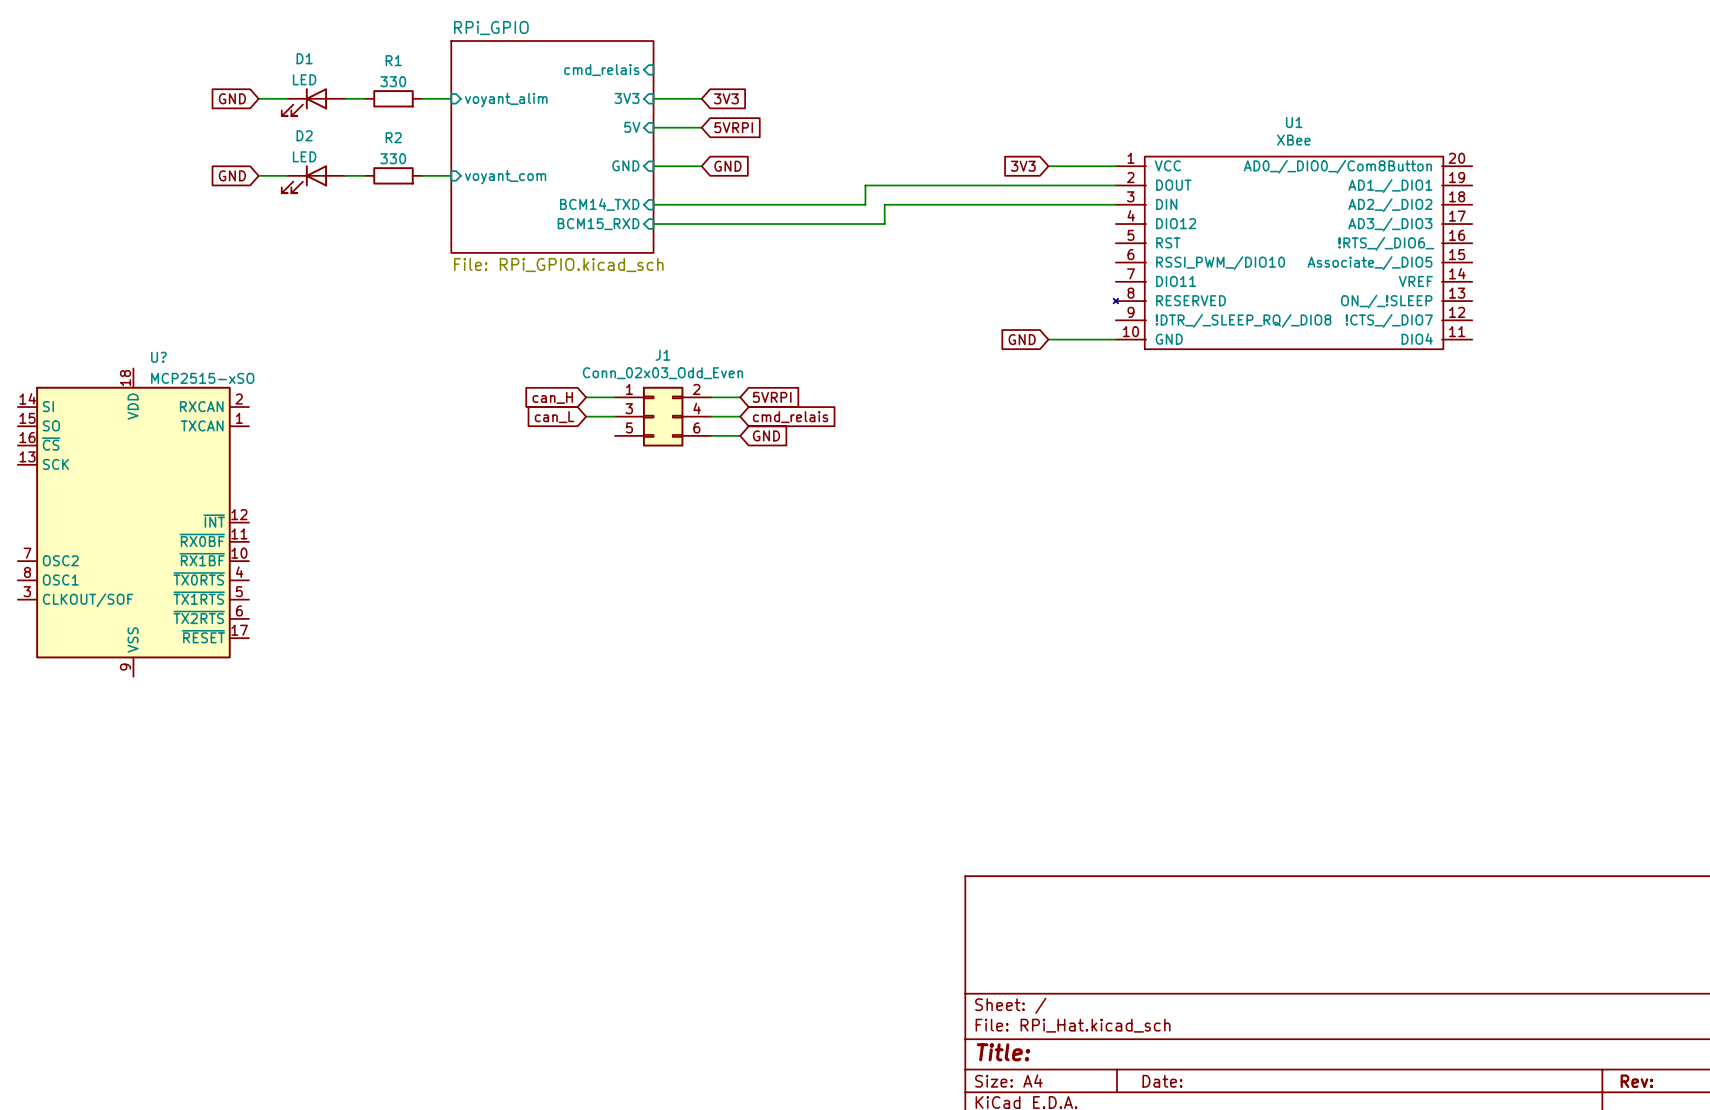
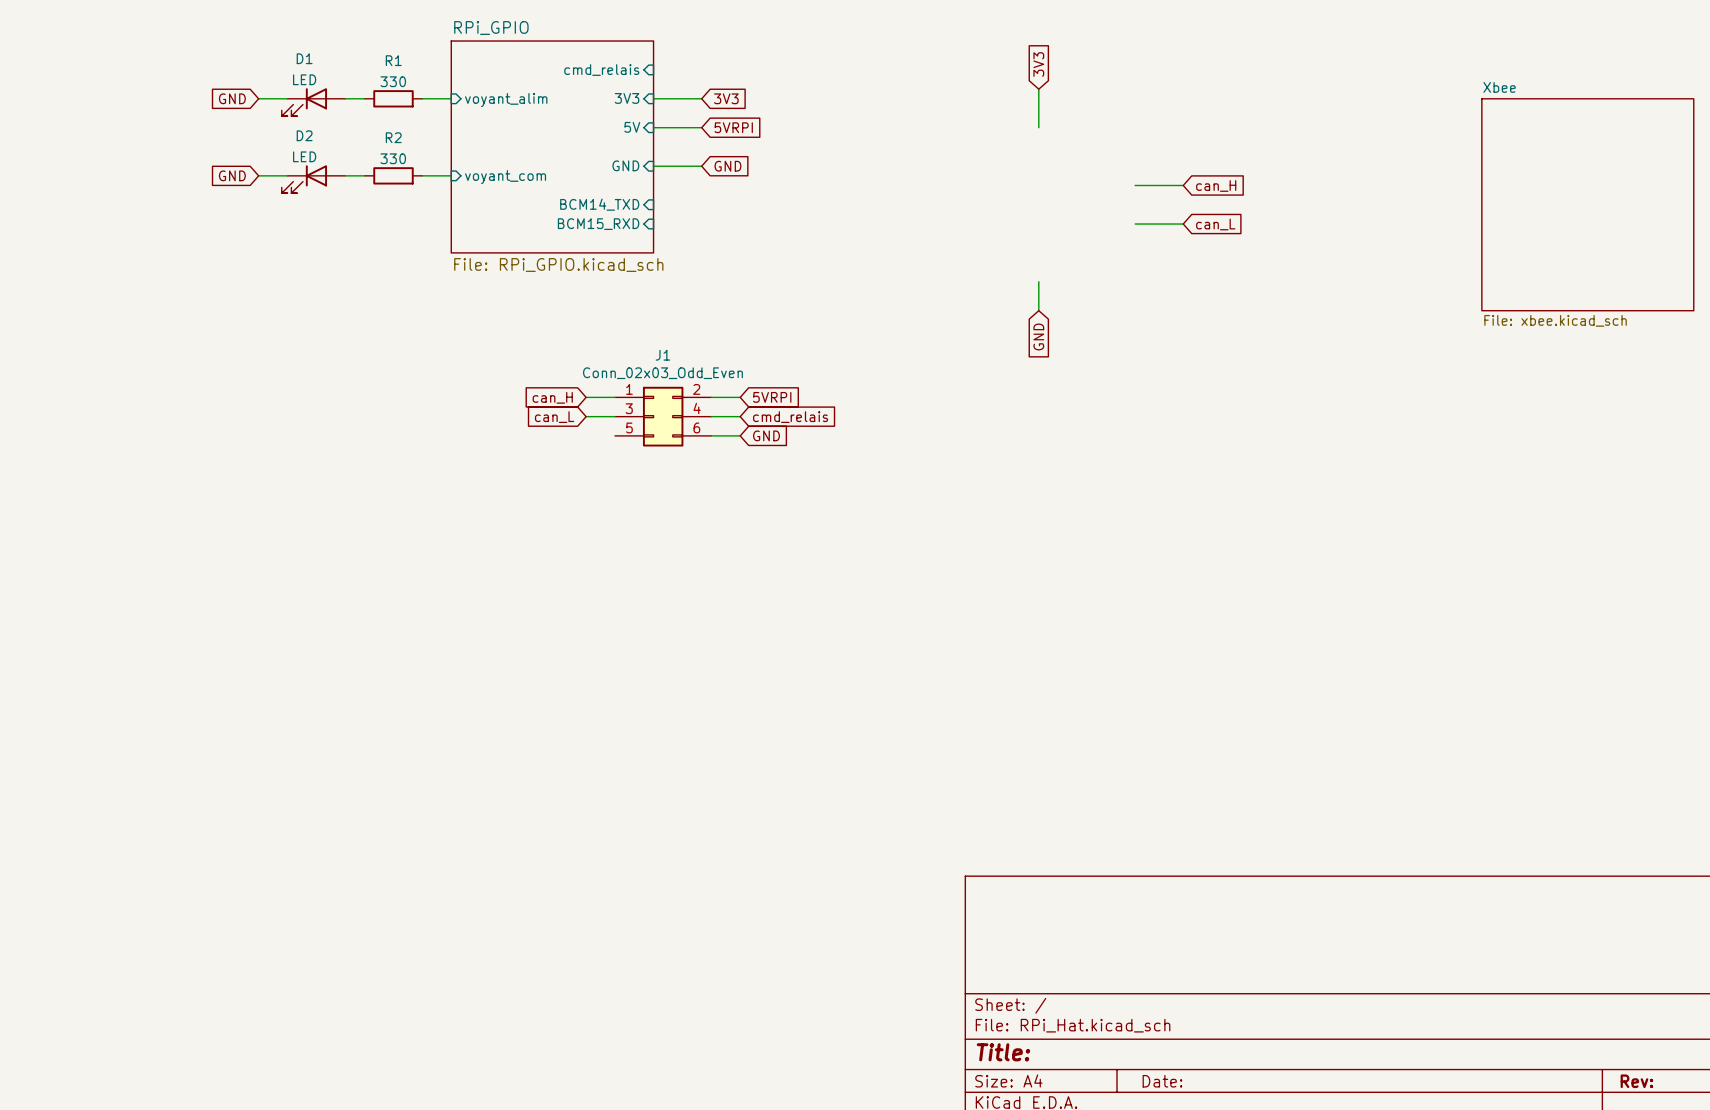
wire: none -> (1038, 89) (1038, 127)
global label rotation: 0° (1023, 166) -> 90° clockwise (1038, 64)
global label position: 3V3 (1023, 166) -> 3V3 (1038, 64)
wire: (1048, 166) (1115, 166) -> none
wire: (1115, 185) (865, 185) (865, 204) (653, 204) -> none
wire: none -> (1135, 185) (1183, 185)
global label: none -> can_H (1216, 185)
wire: (1115, 204) (884, 204) (884, 224) (653, 224) -> none
sheet Xbee: none -> File: xbee.kicad_sch (1587, 204)
wire: none -> (1135, 224) (1183, 224)
global label: none -> can_L (1215, 224)
U1: XBee (1292, 252) -> none
wire: none -> (1038, 281) (1038, 310)
global label rotation: 0° (1022, 339) -> 90° counterclockwise (1038, 336)
wire: (1048, 339) (1115, 339) -> none
U?: MCP2515-xSO (133, 522) -> none

